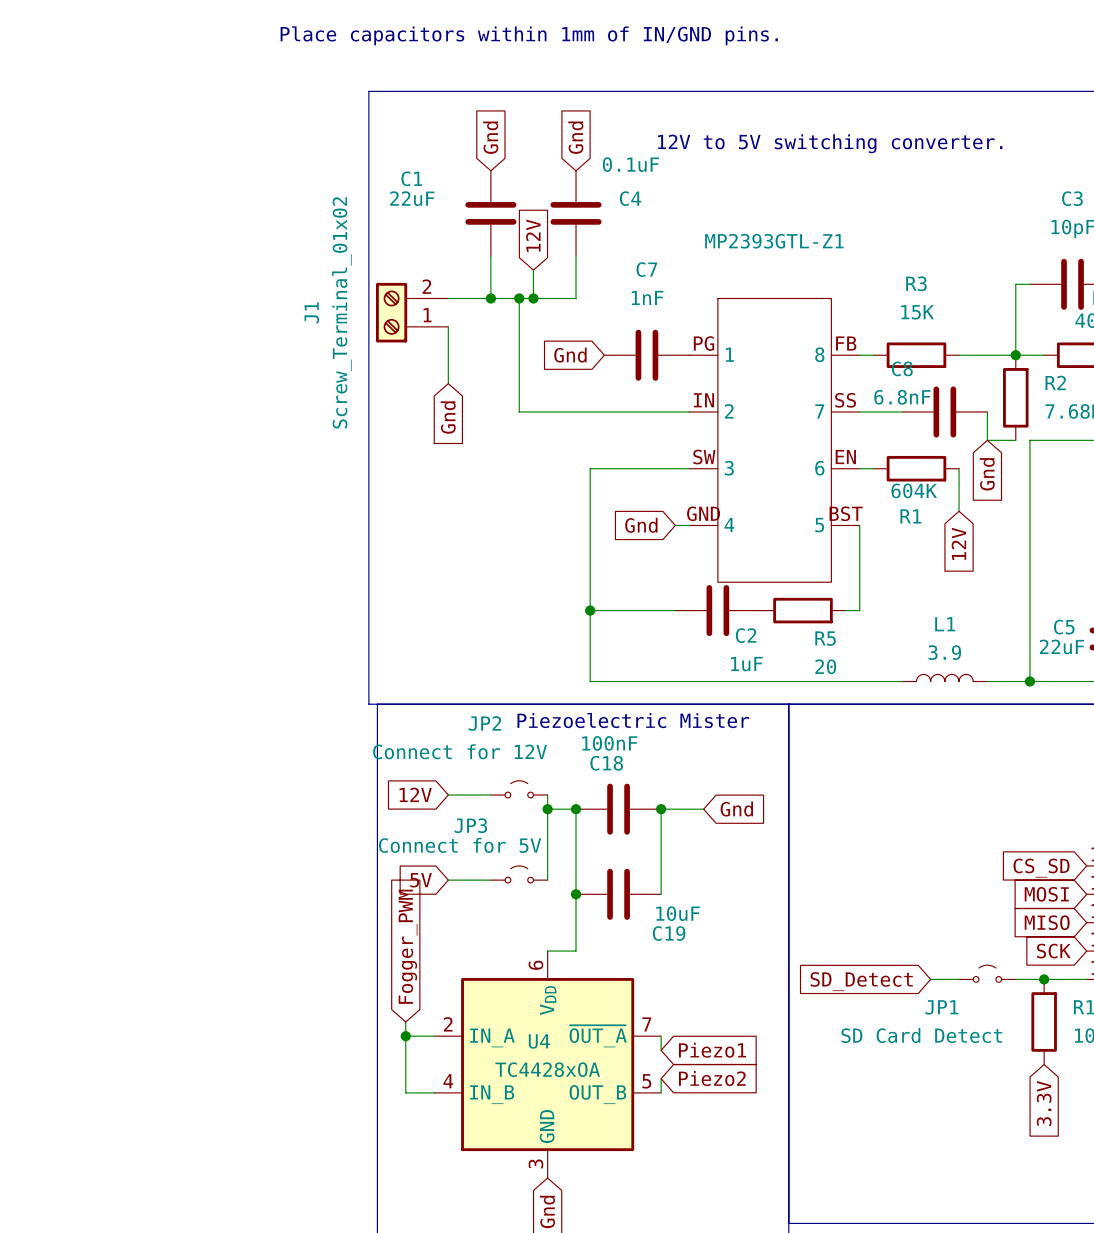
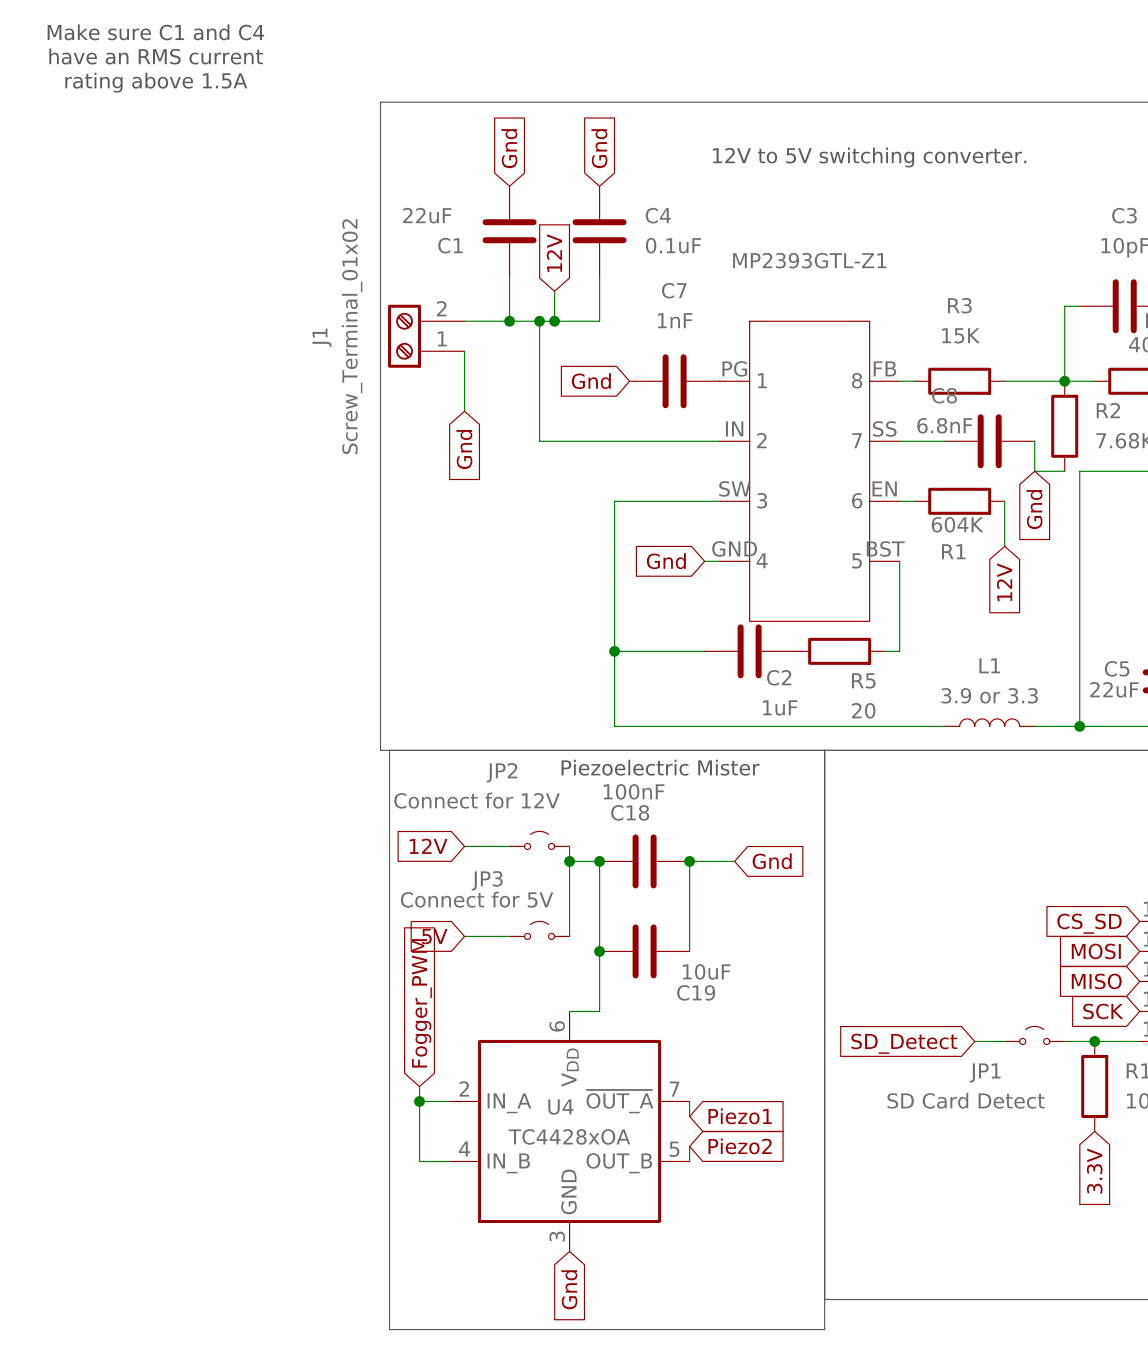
text: none -> Make sure C1 and C4 (155, 32)
text: Place capacitors within 1mm of IN/GND pins. (529, 35) -> none
text: none -> have an RMS current (156, 56)
text: none -> rating above 1.5A (156, 82)
C4 value position: 0.1uF (630, 164) -> 0.1uF (673, 245)
C1 name position: C1 (411, 178) -> C1 (450, 245)
L1 value: 3.9 (944, 652) -> 3.9 or 3.3 (989, 695)

